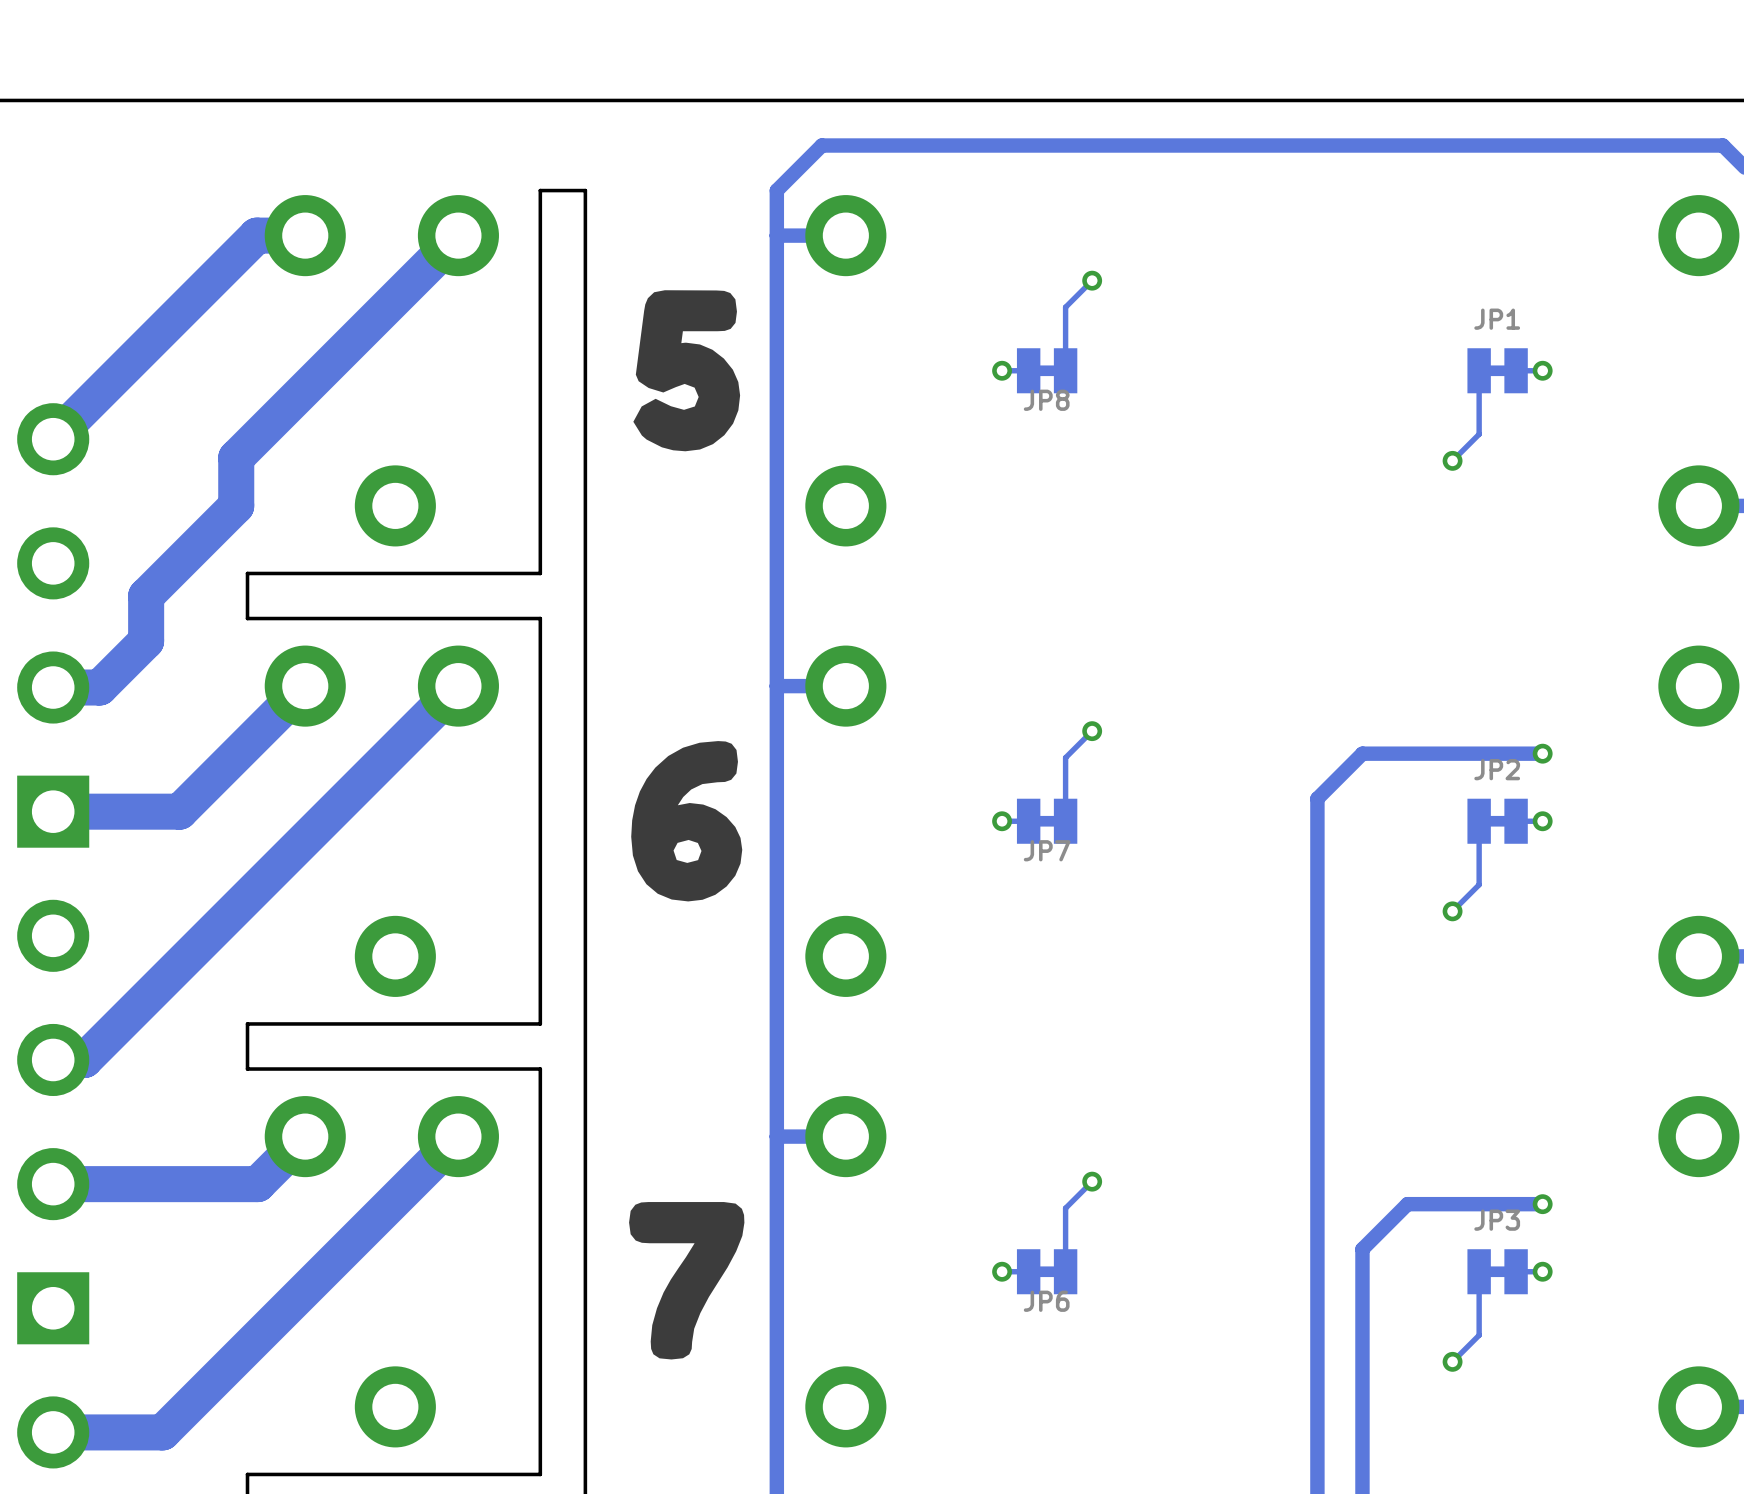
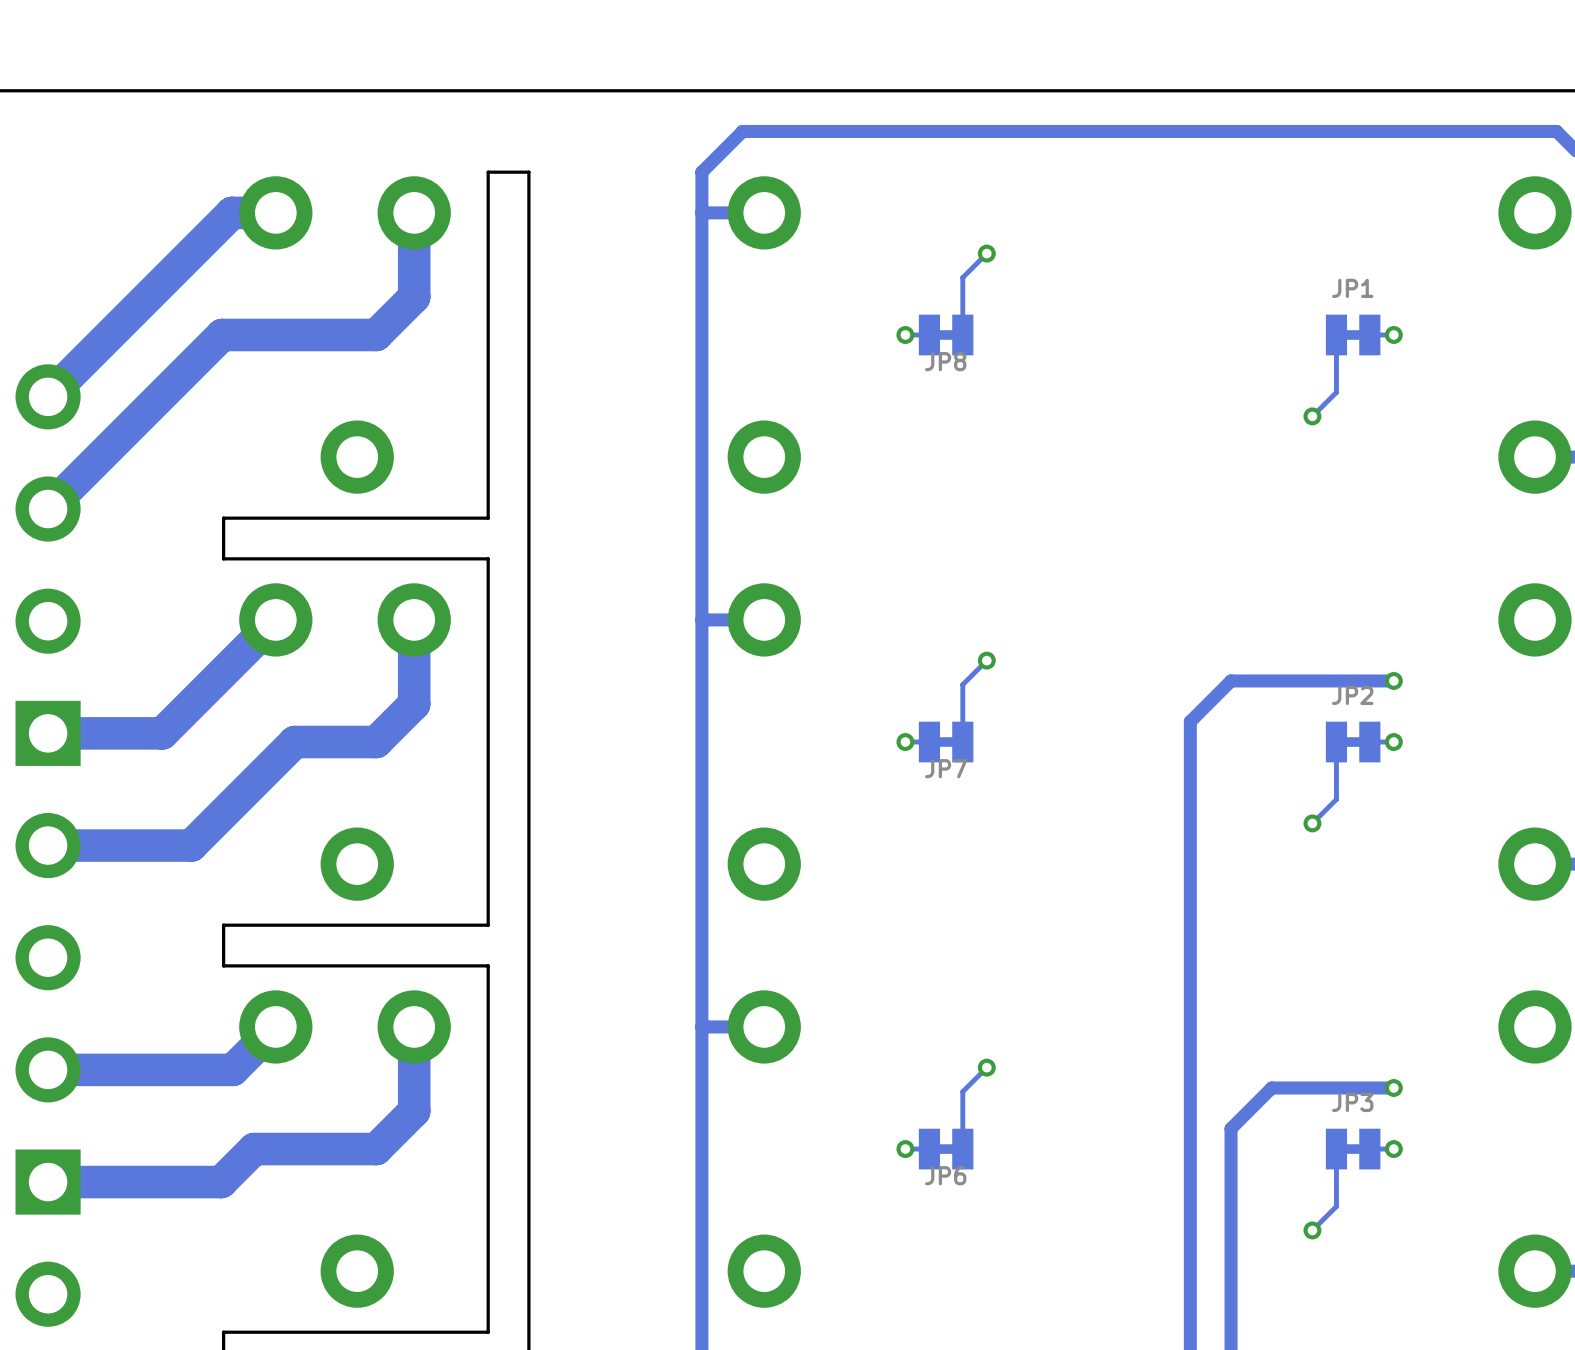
track: (458, 235) (236, 457) (236, 505) (146, 596) (146, 641) (99, 687) (53, 687) -> (414, 212) (414, 297) (376, 334) (222, 334) (48, 509)
drawing: [633, 290, 741, 452] -> none
track: (458, 686) (84, 1059) (53, 1059) -> (414, 619) (414, 704) (376, 742) (294, 742) (191, 845) (48, 845)
drawing: [631, 741, 743, 902] -> none
track: (458, 1136) (162, 1432) (53, 1432) -> (414, 1026) (414, 1111) (376, 1149) (254, 1149) (221, 1182) (48, 1182)
drawing: [629, 1202, 745, 1360] -> none

